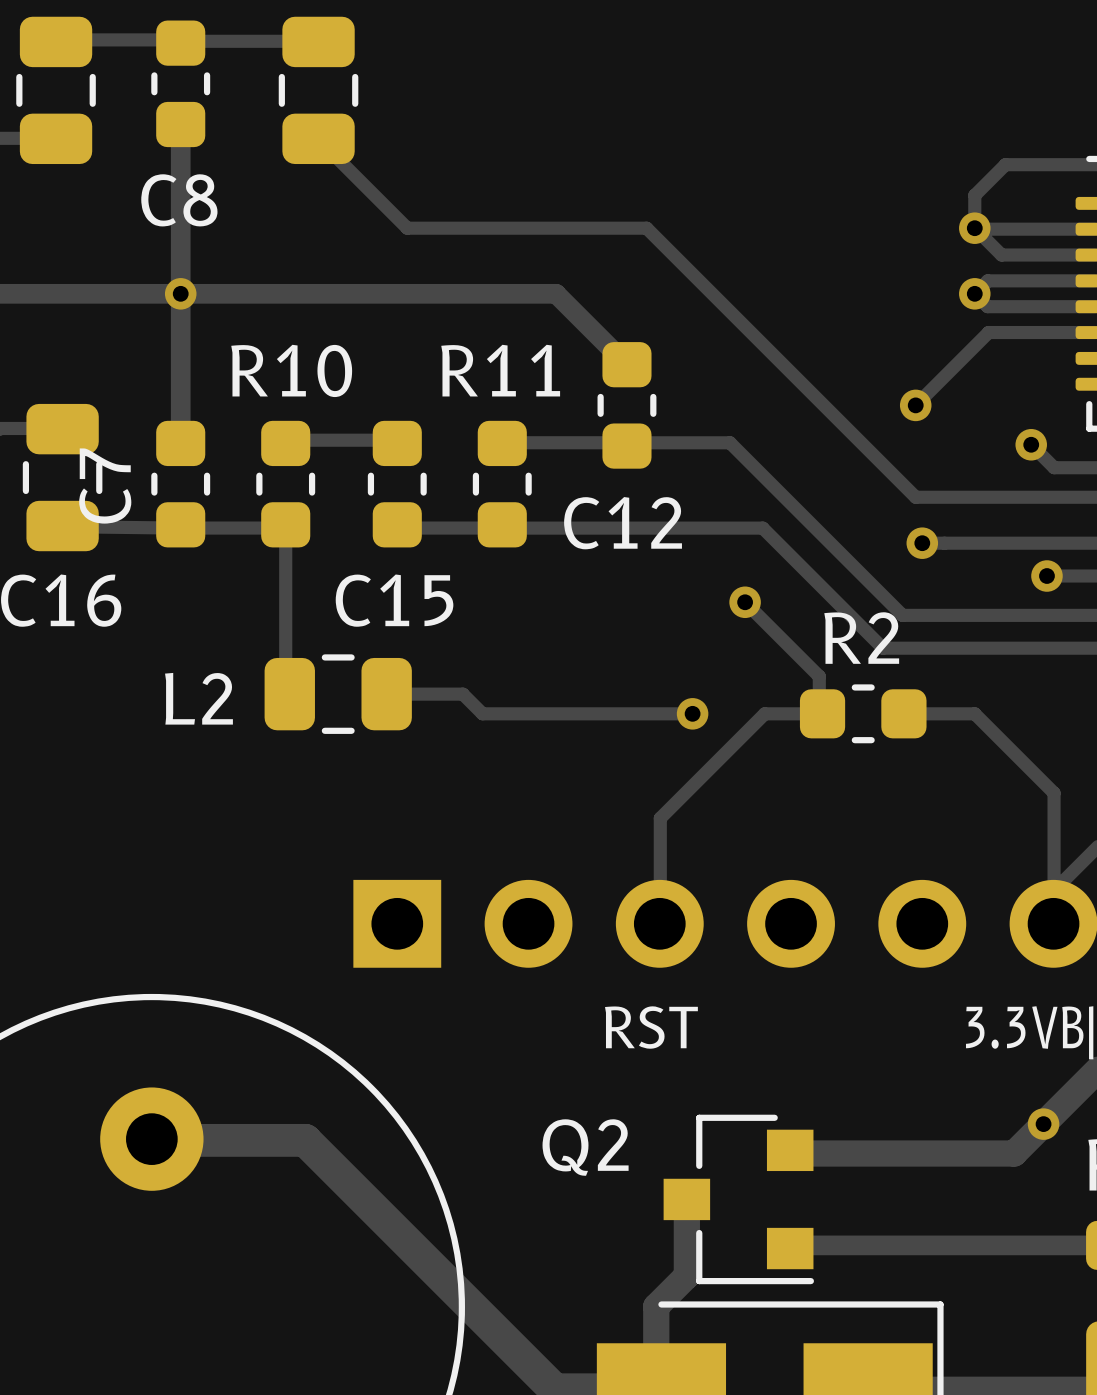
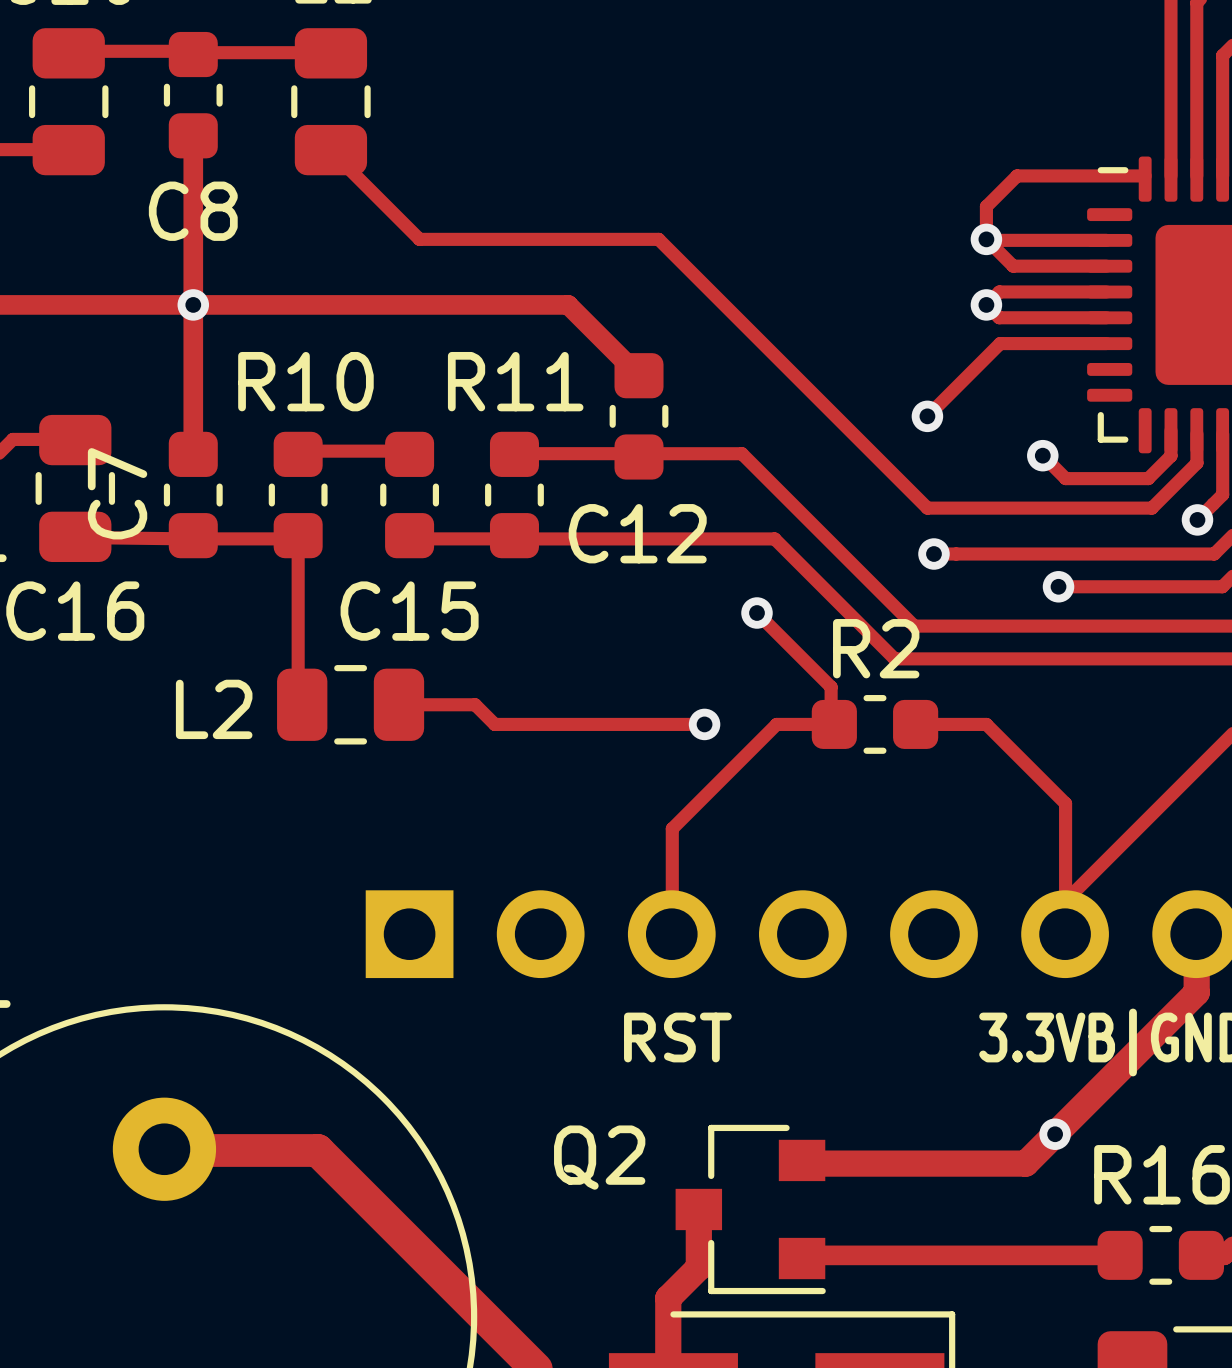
track: (686, 1257) (686, 1275) (656, 1306) -> (698, 1267) (668, 1298) (668, 1316)

